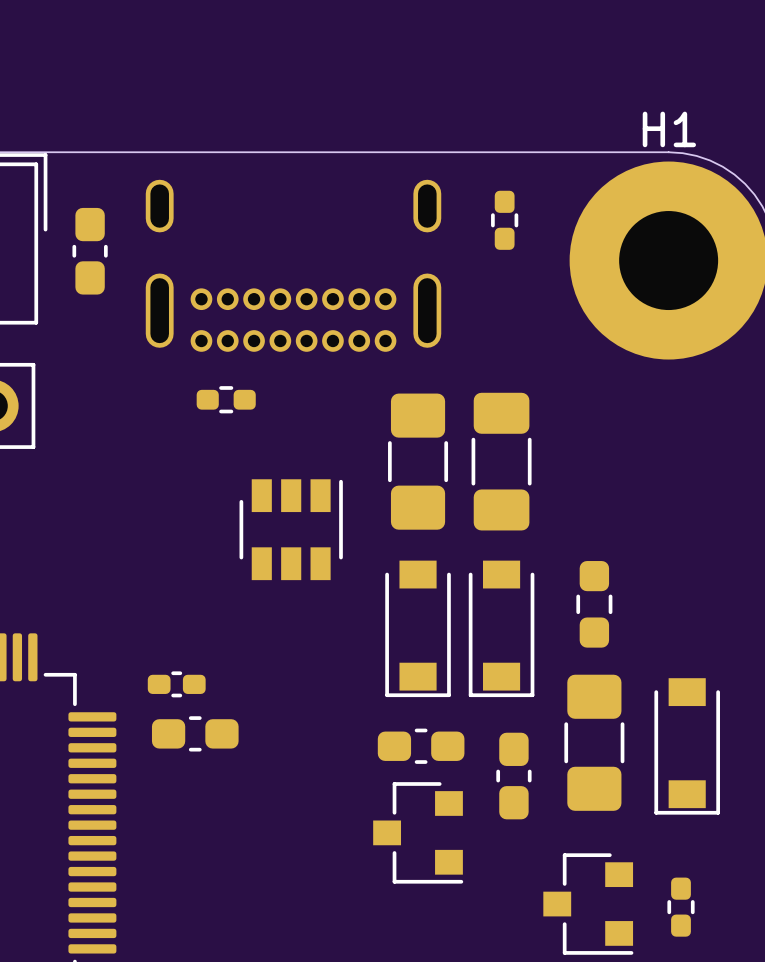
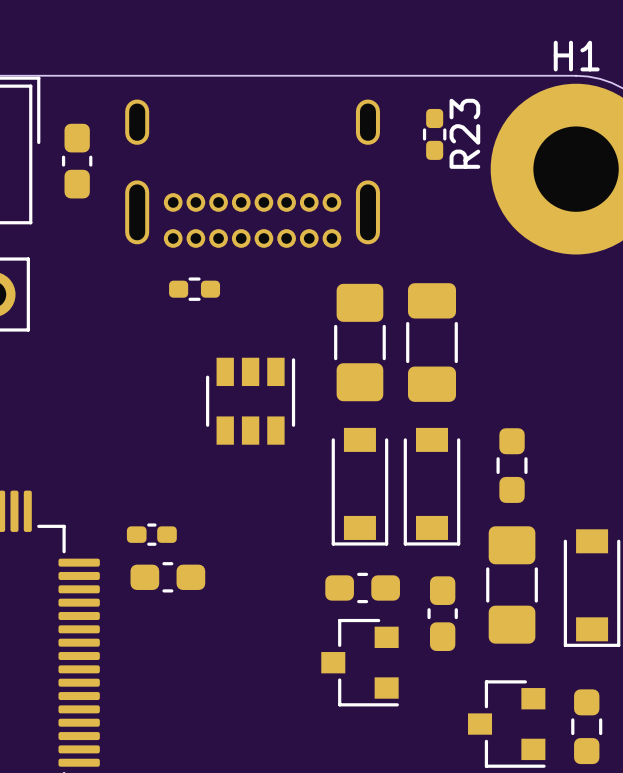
R23 name: none -> R23 (464, 133)
part footprint: [667, 877, 695, 937] -> [571, 689, 603, 765]

